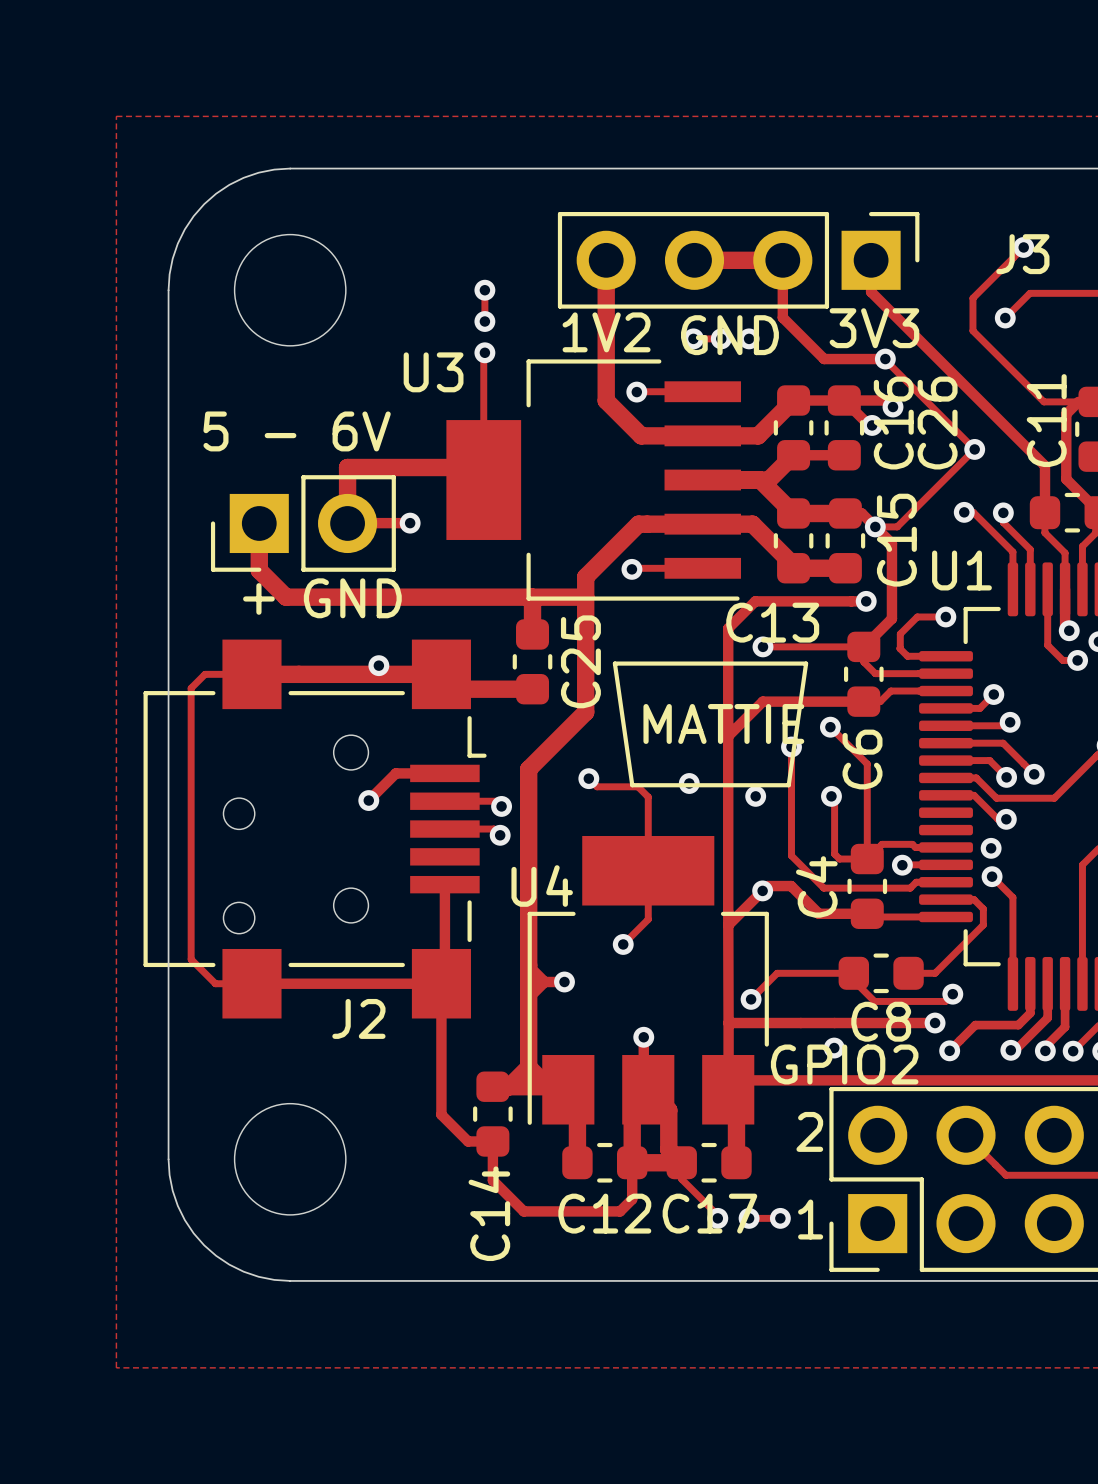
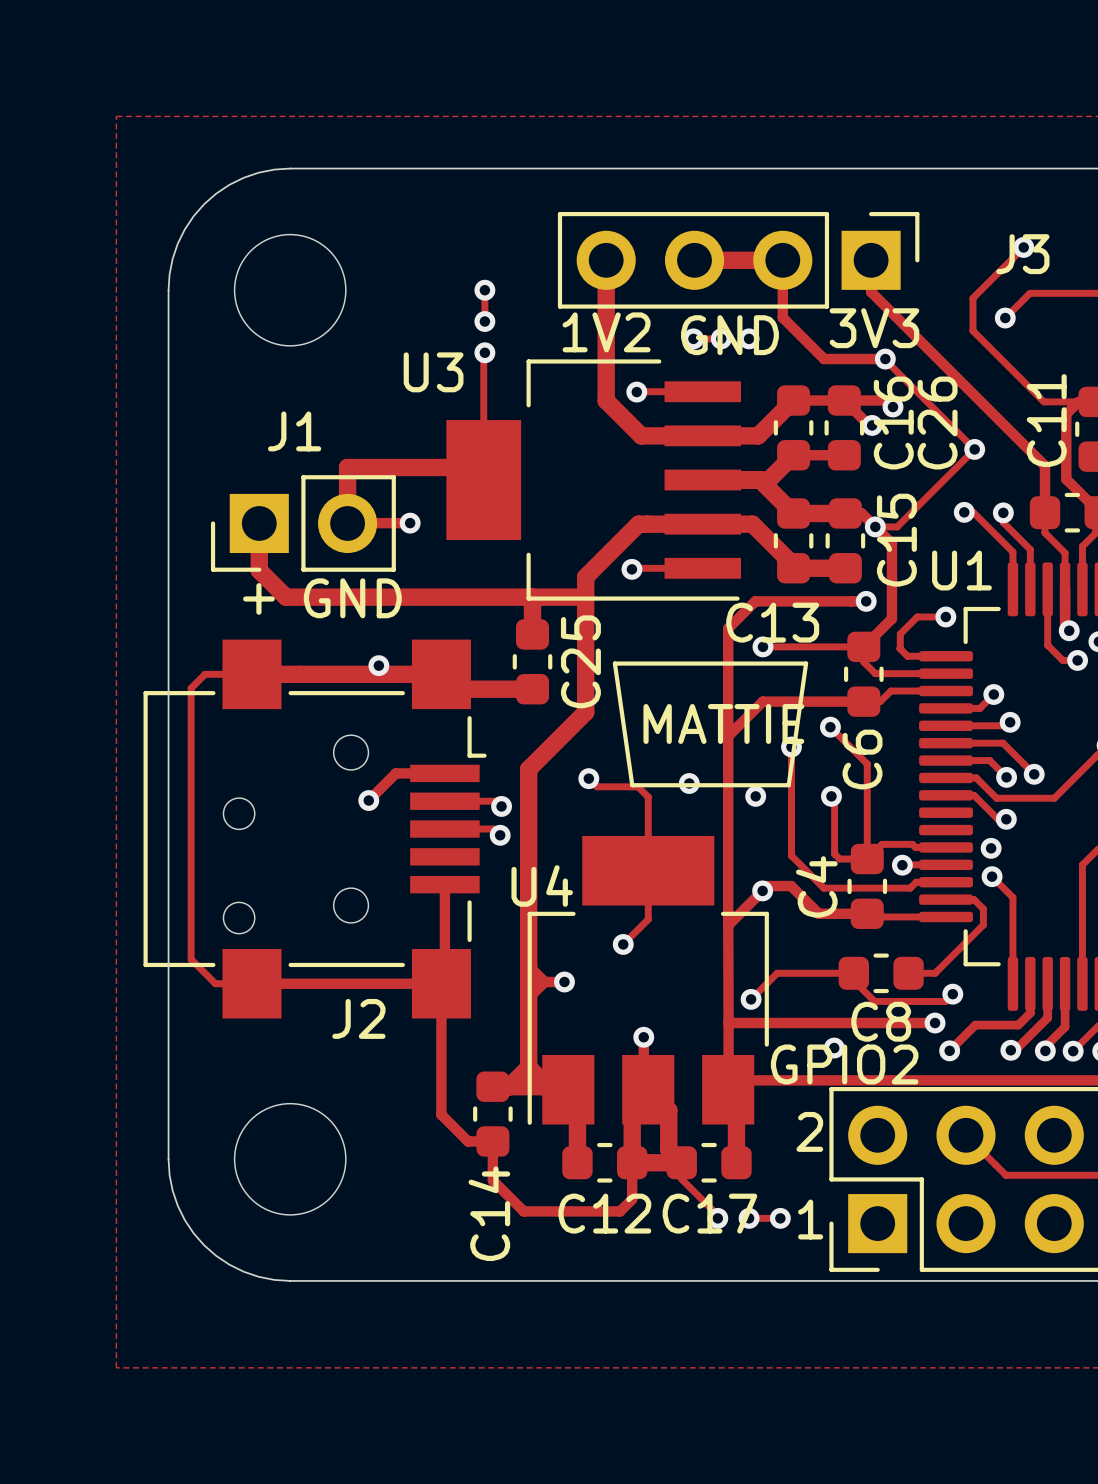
5 - 6V name: 5 - 6V (297, 431) -> J1 (294, 431)

